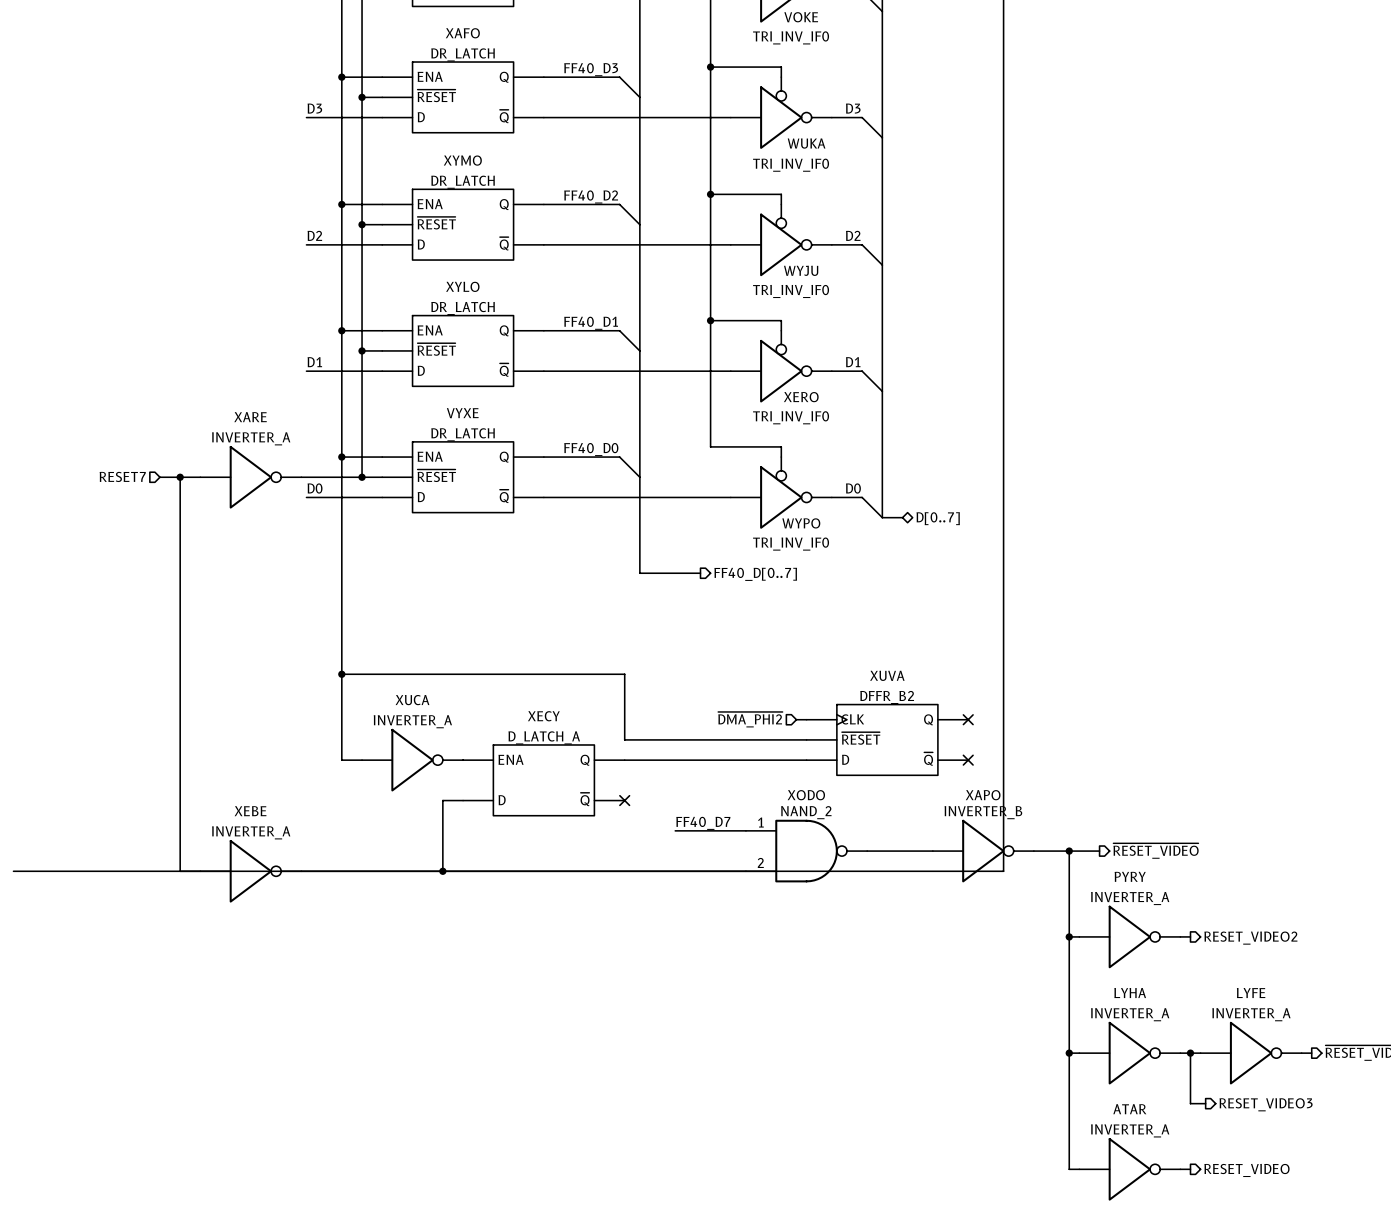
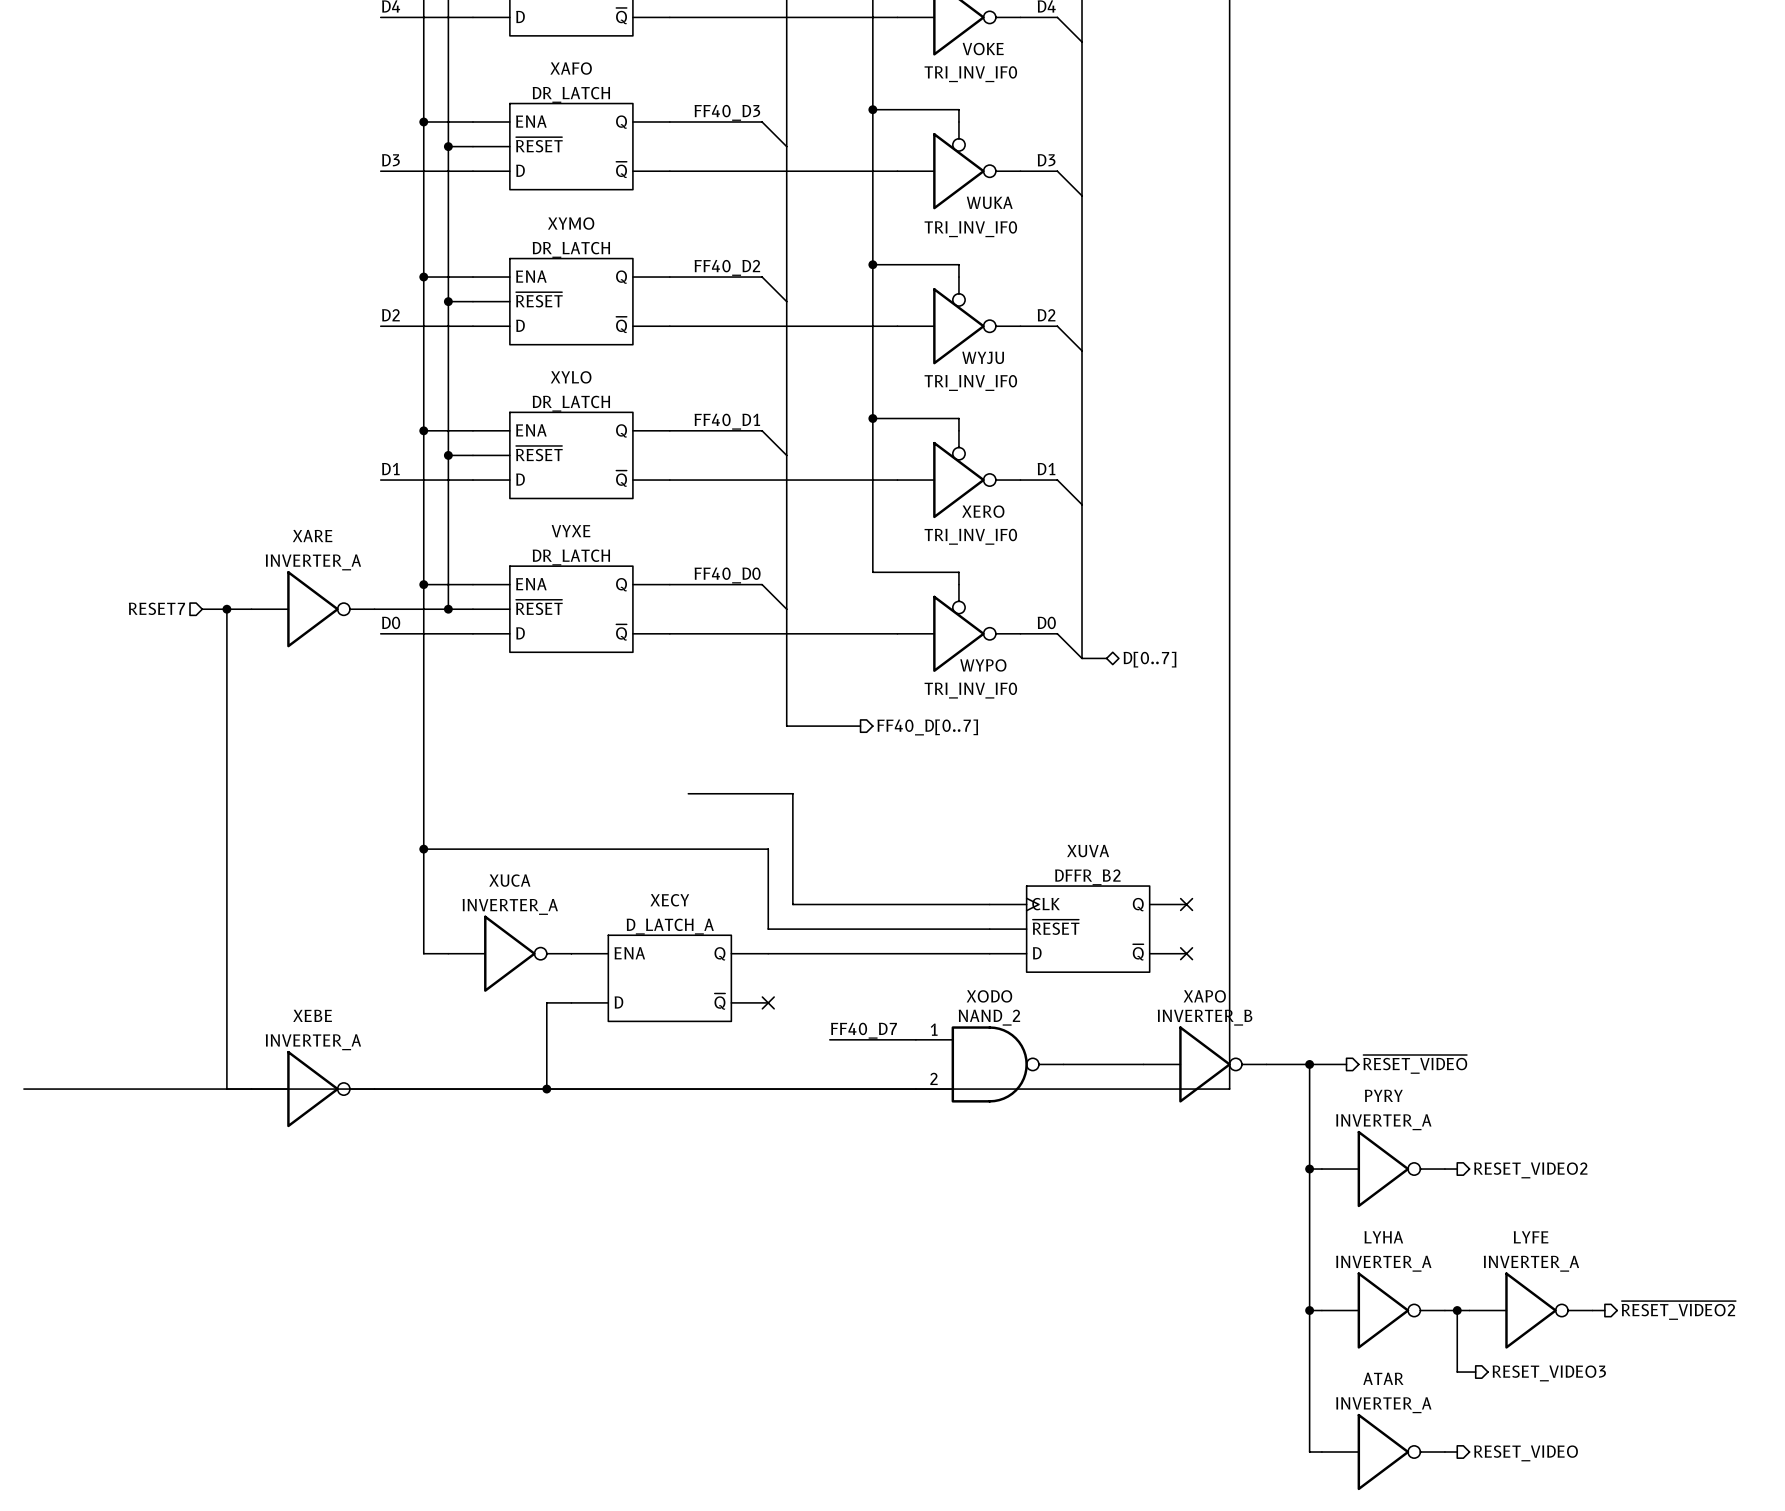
wire: none -> (688, 793) (792, 793) (792, 904) (977, 904)
hierarchical label: ~{DMA_PHI2} (750, 719) -> none

